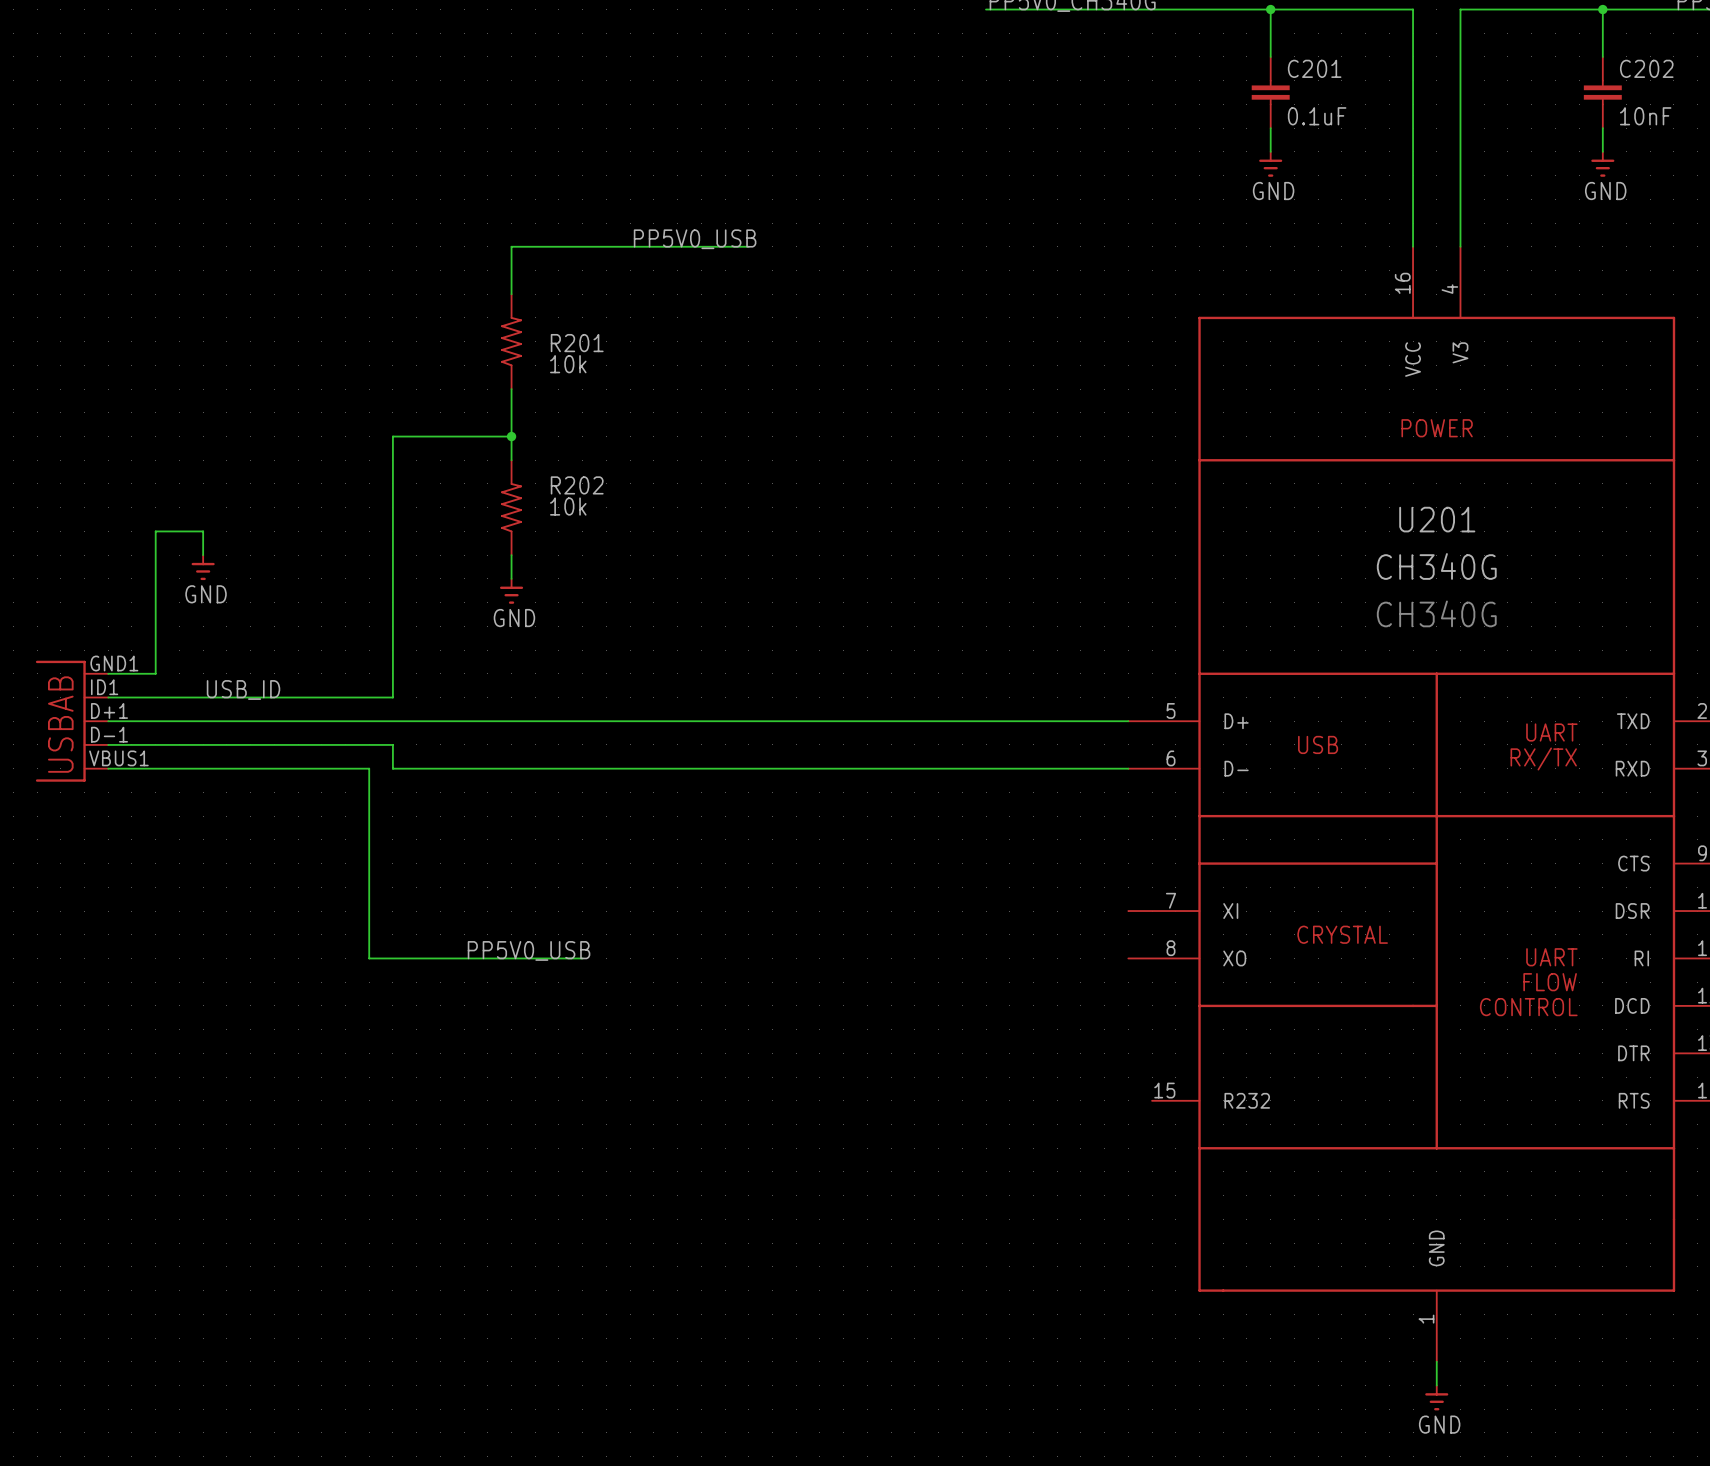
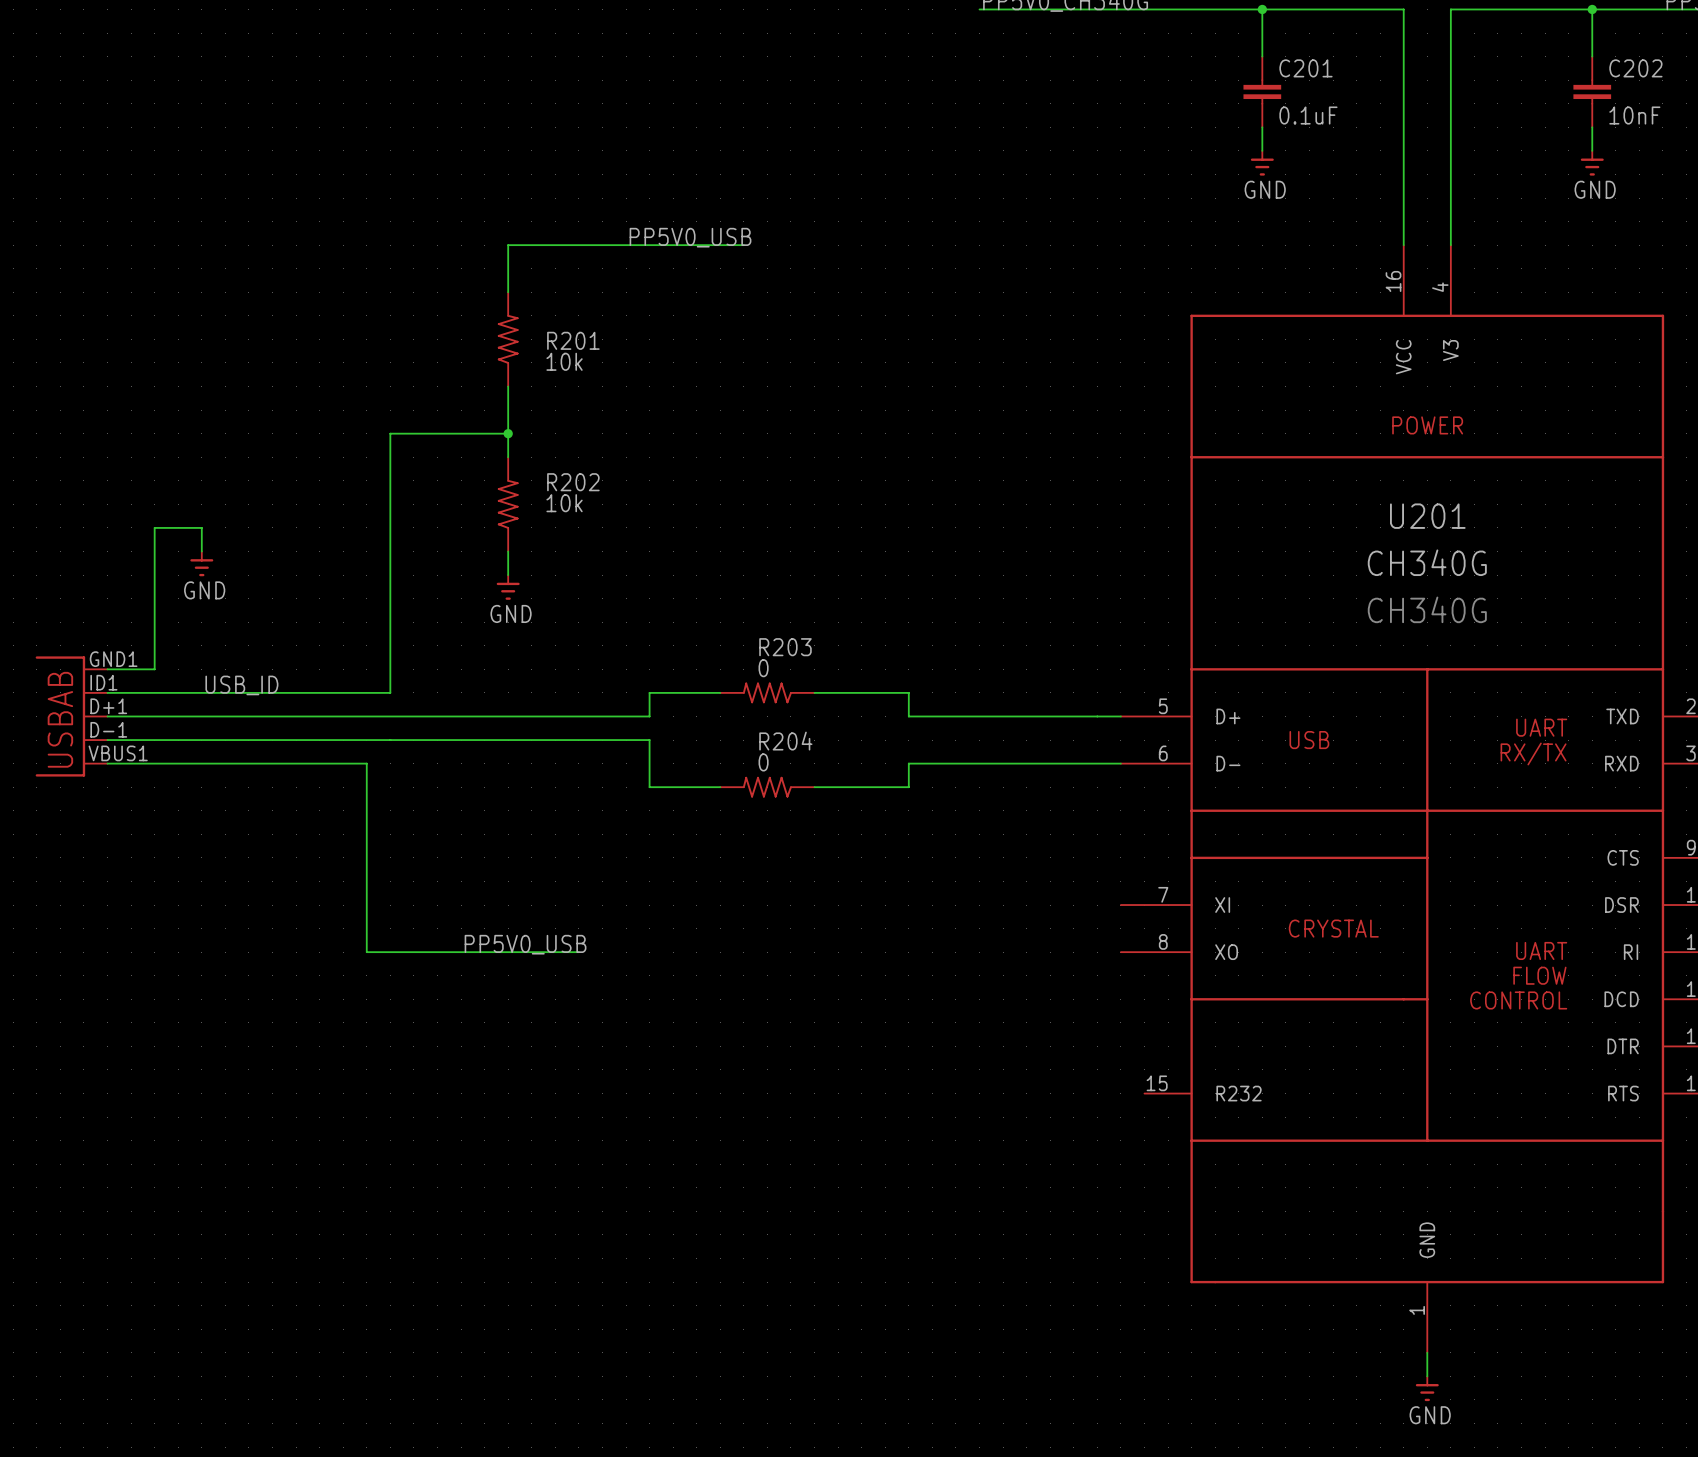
wire: none -> (720, 692) (649, 692) (649, 716)
R203: none -> 0 (767, 692)
wire: (653, 721) (914, 721) -> (814, 692) (908, 692) (908, 716)
wire: (392, 744) (392, 768) (914, 768) -> (390, 740) (649, 740) (649, 787) (720, 787)
wire: none -> (908, 763) (908, 787) (814, 787)
R204: none -> 0 (767, 787)

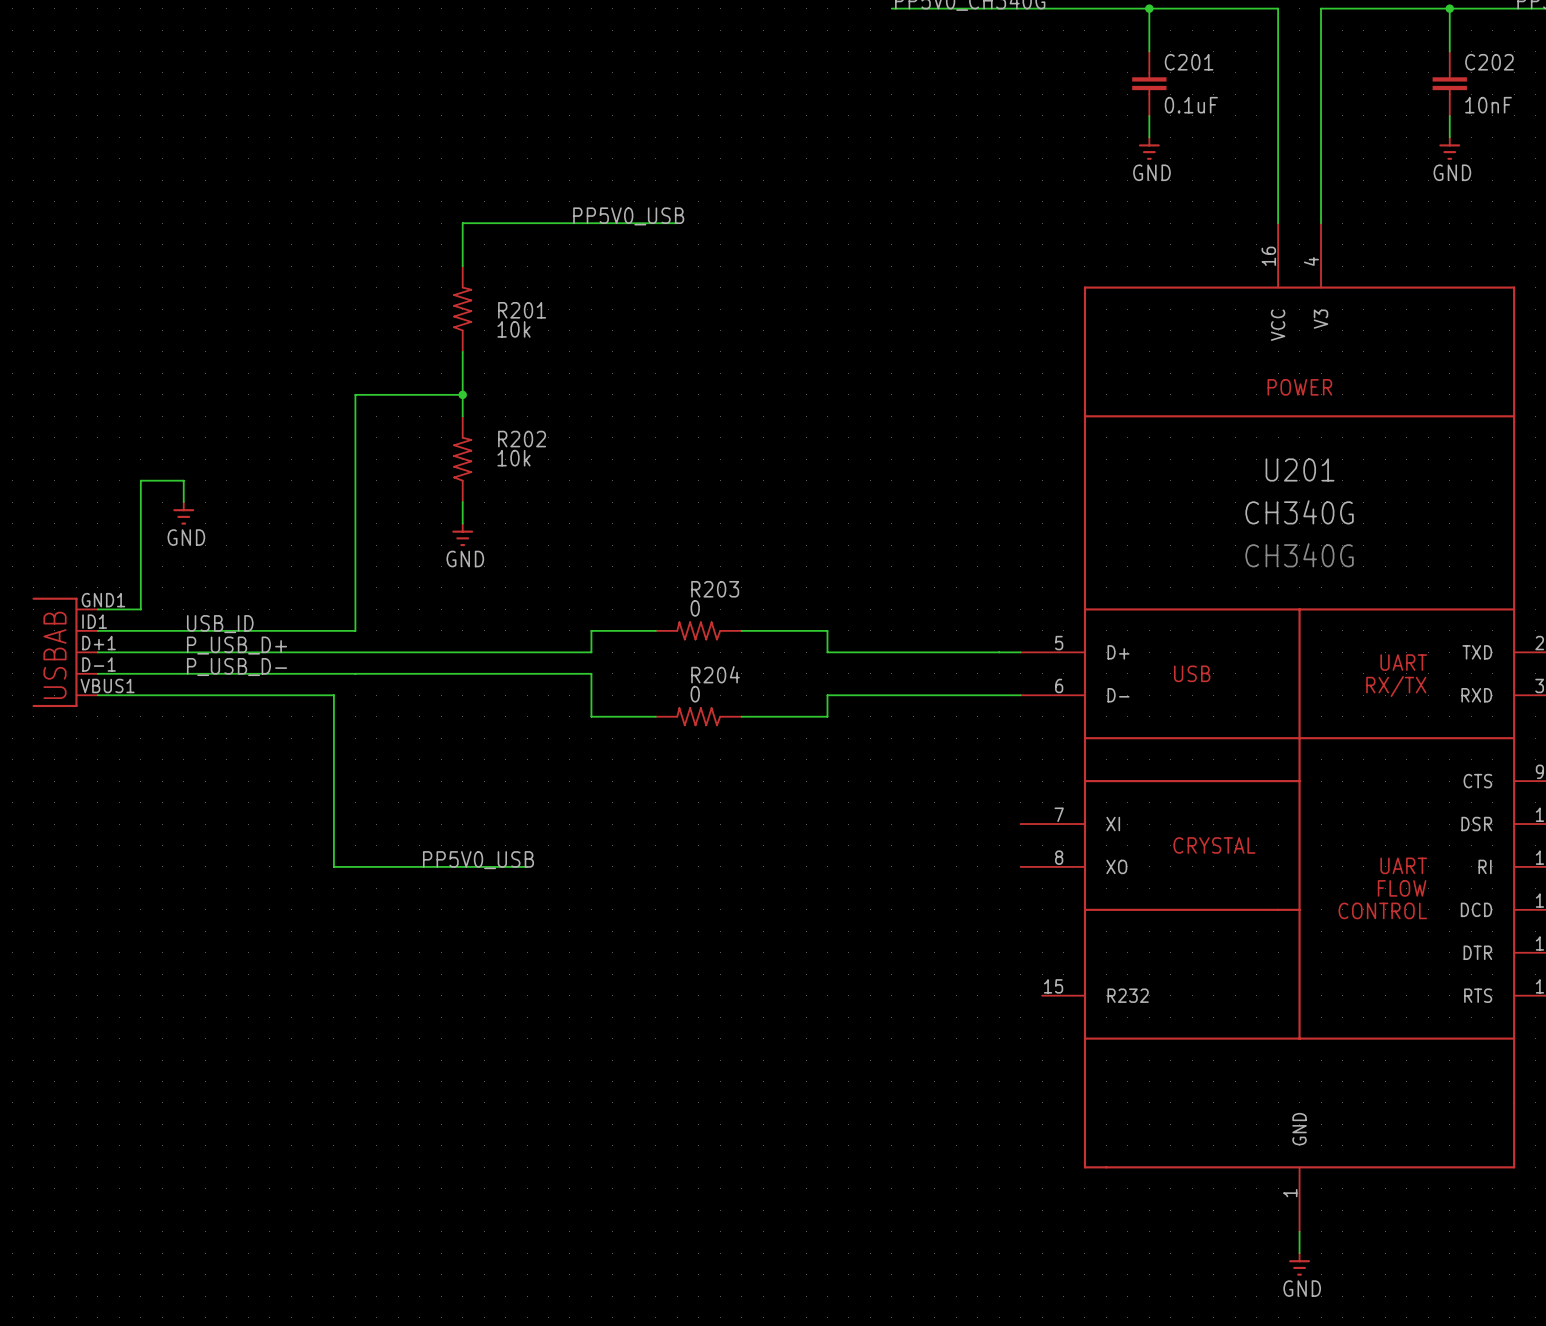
label: none -> P_USB_D+ (237, 645)
label: none -> P_USB_D- (237, 667)

